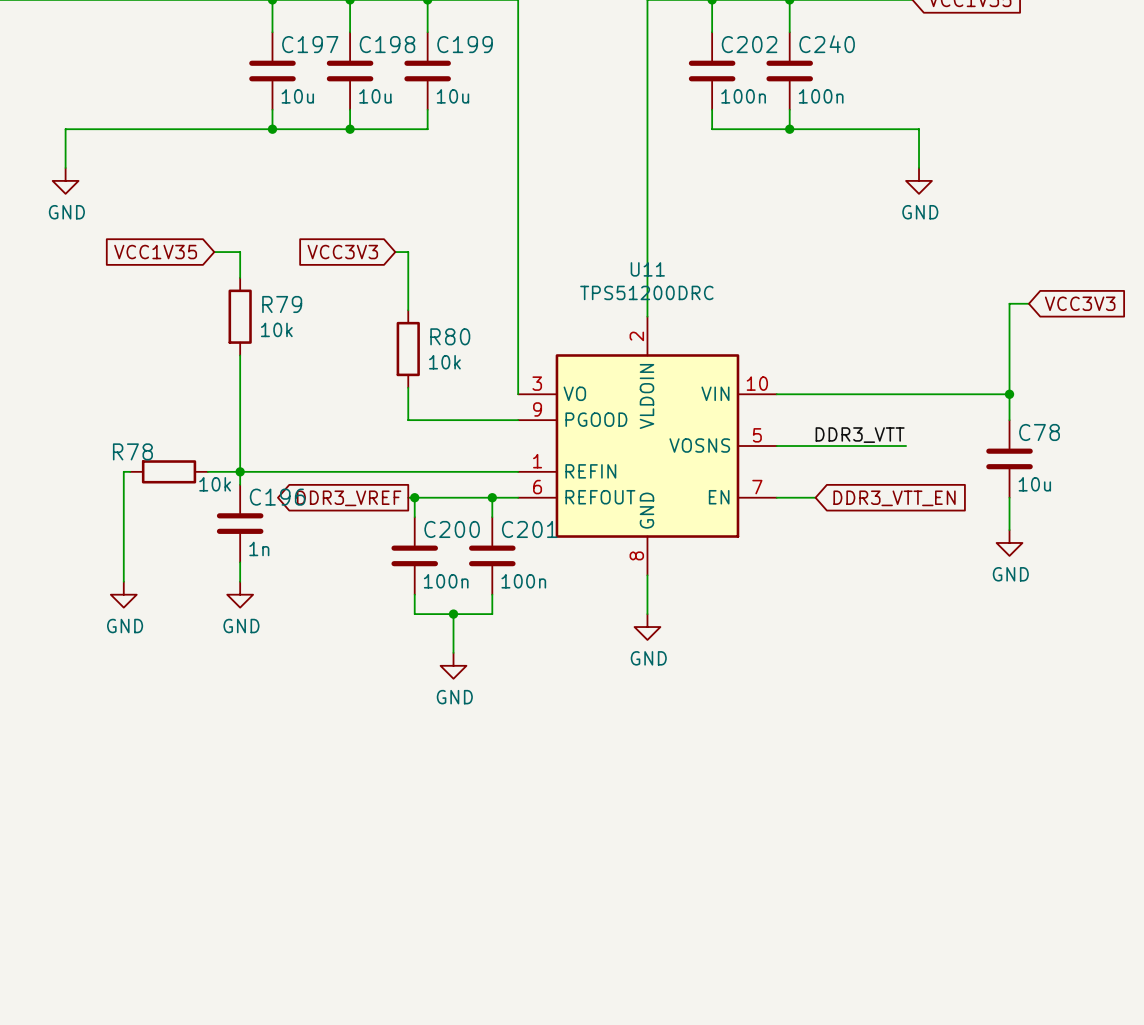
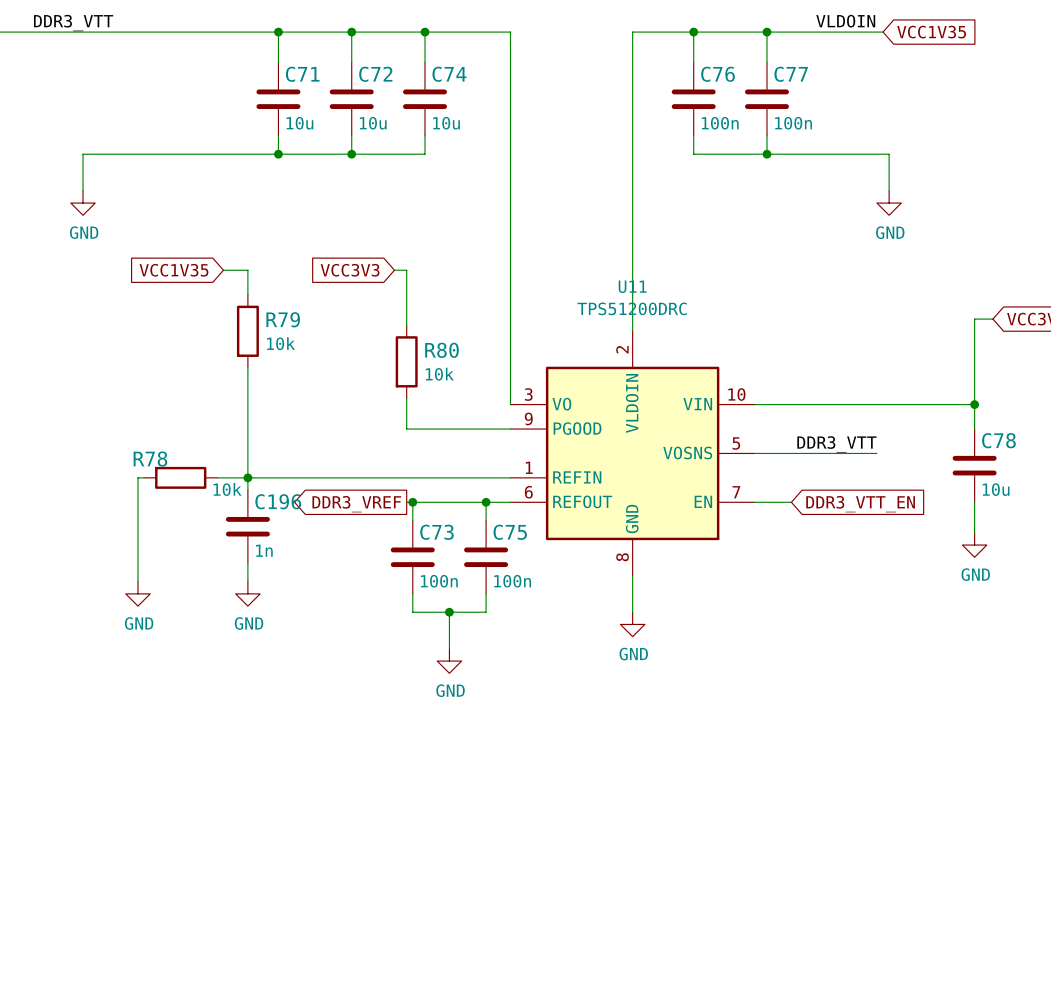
C197 name: C197 (310, 44) -> C71 (302, 74)
C198 name: C198 (387, 44) -> C72 (375, 74)
C199 name: C199 (465, 44) -> C74 (449, 74)
C202 name: C202 (749, 44) -> C76 (717, 74)
C240 name: C240 (827, 44) -> C77 (791, 74)
C200 name: C200 (452, 529) -> C73 (436, 532)
C201 name: C201 (529, 529) -> C75 (510, 532)

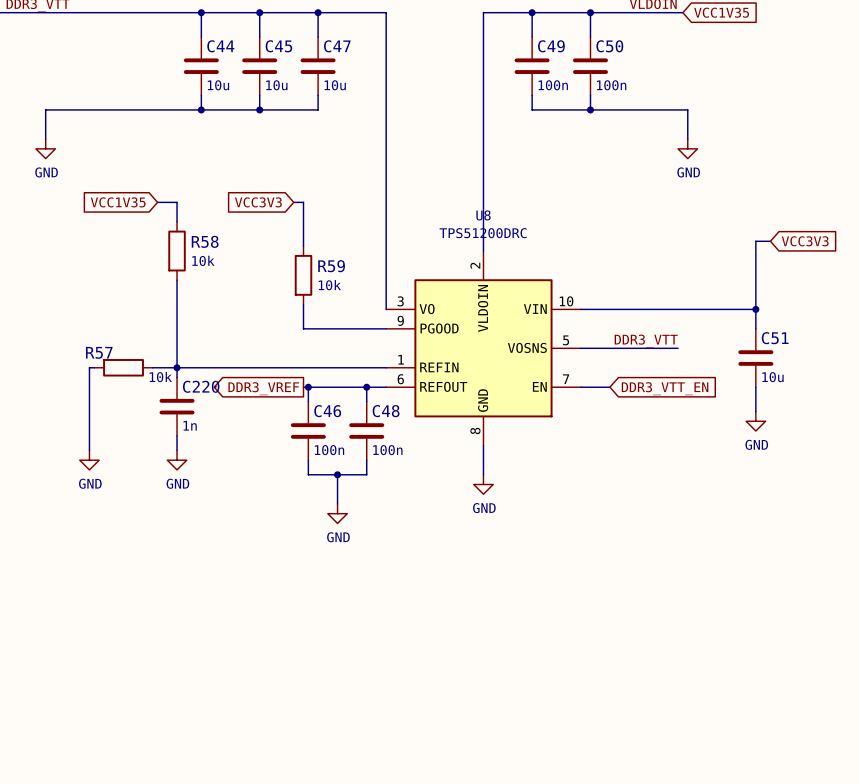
C71 name: C71 (302, 74) -> C44 (220, 46)
C72 name: C72 (375, 74) -> C45 (278, 46)
C74 name: C74 (449, 74) -> C47 (337, 46)
C76 name: C76 (717, 74) -> C49 (551, 46)
C77 name: C77 (791, 74) -> C50 (609, 46)
U11 name: U11 (632, 286) -> U8 (483, 215)
R79 name: R79 (283, 319) -> R58 (205, 241)
R80 name: R80 (441, 350) -> R59 (331, 266)
C78 name: C78 (998, 440) -> C51 (775, 338)
R78 name: R78 (150, 459) -> R57 (99, 352)
C196 name: C196 (278, 501) -> C220 (201, 386)
C73 name: C73 (436, 532) -> C46 (327, 411)
C75 name: C75 (510, 532) -> C48 (386, 411)

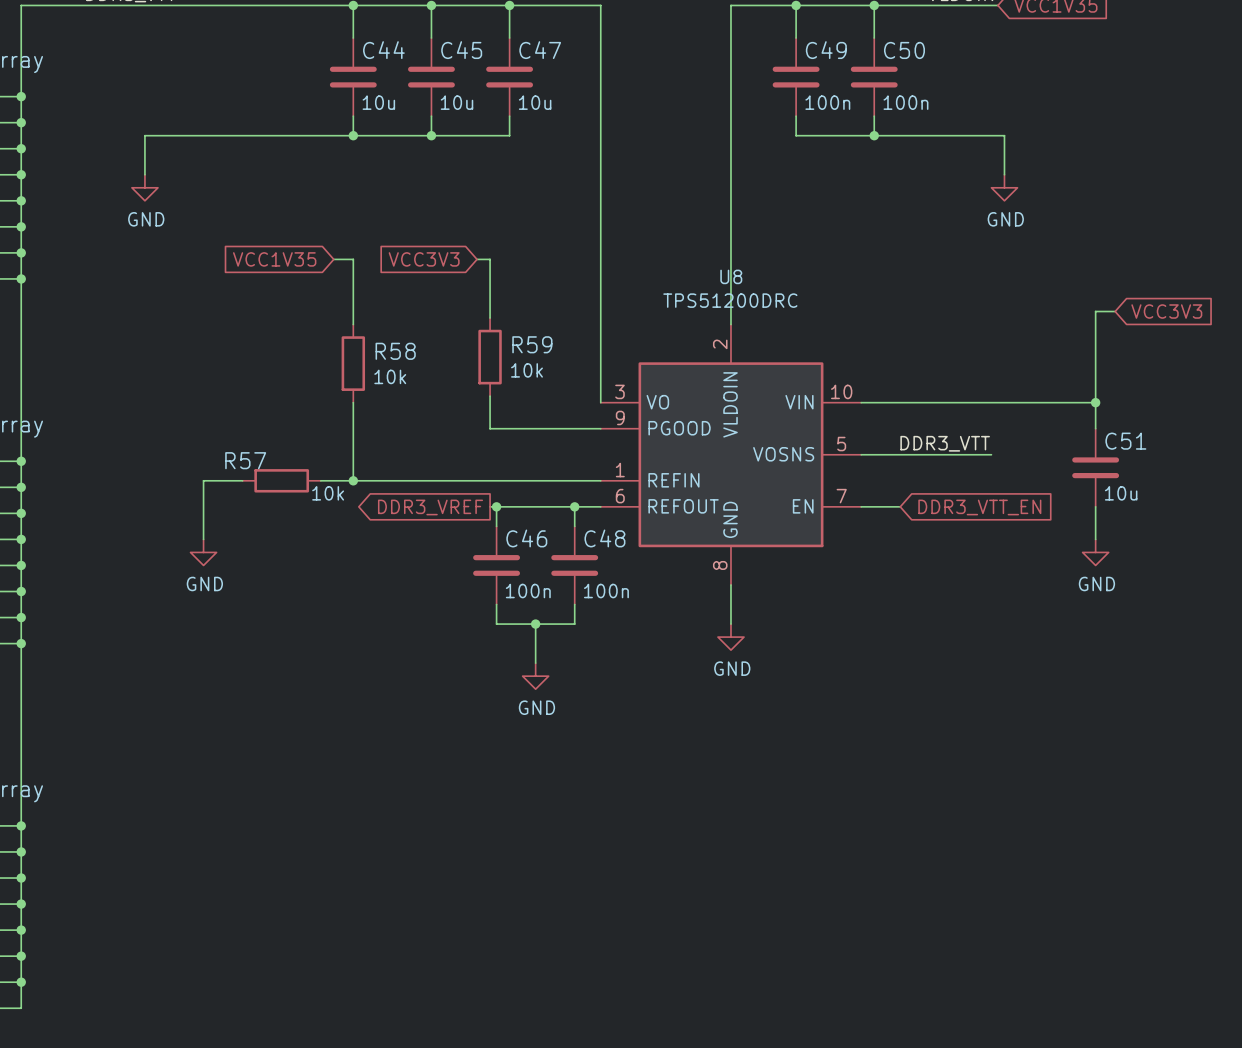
global label position: VCC1V35 (118, 202) -> VCC1V35 (274, 259)
wire: (157, 202) (177, 202) (177, 221) -> none
wire: none -> (333, 259) (353, 259) (353, 324)
R58 position: (177, 251) -> (353, 363)
wire: (177, 280) (177, 377) -> none
wire: none -> (353, 402) (353, 480)
R57 position: (123, 367) -> (281, 480)
wire: (152, 367) (177, 367) -> (210, 480) (242, 480)
junction position: (177, 367) -> (353, 480)
C220: (177, 406) -> none
wire: (89, 411) (89, 450) -> none
wire: (177, 435) (177, 450) -> none
power symbol position: GND (89, 460) -> GND (203, 552)
power symbol: GND (177, 460) -> none

